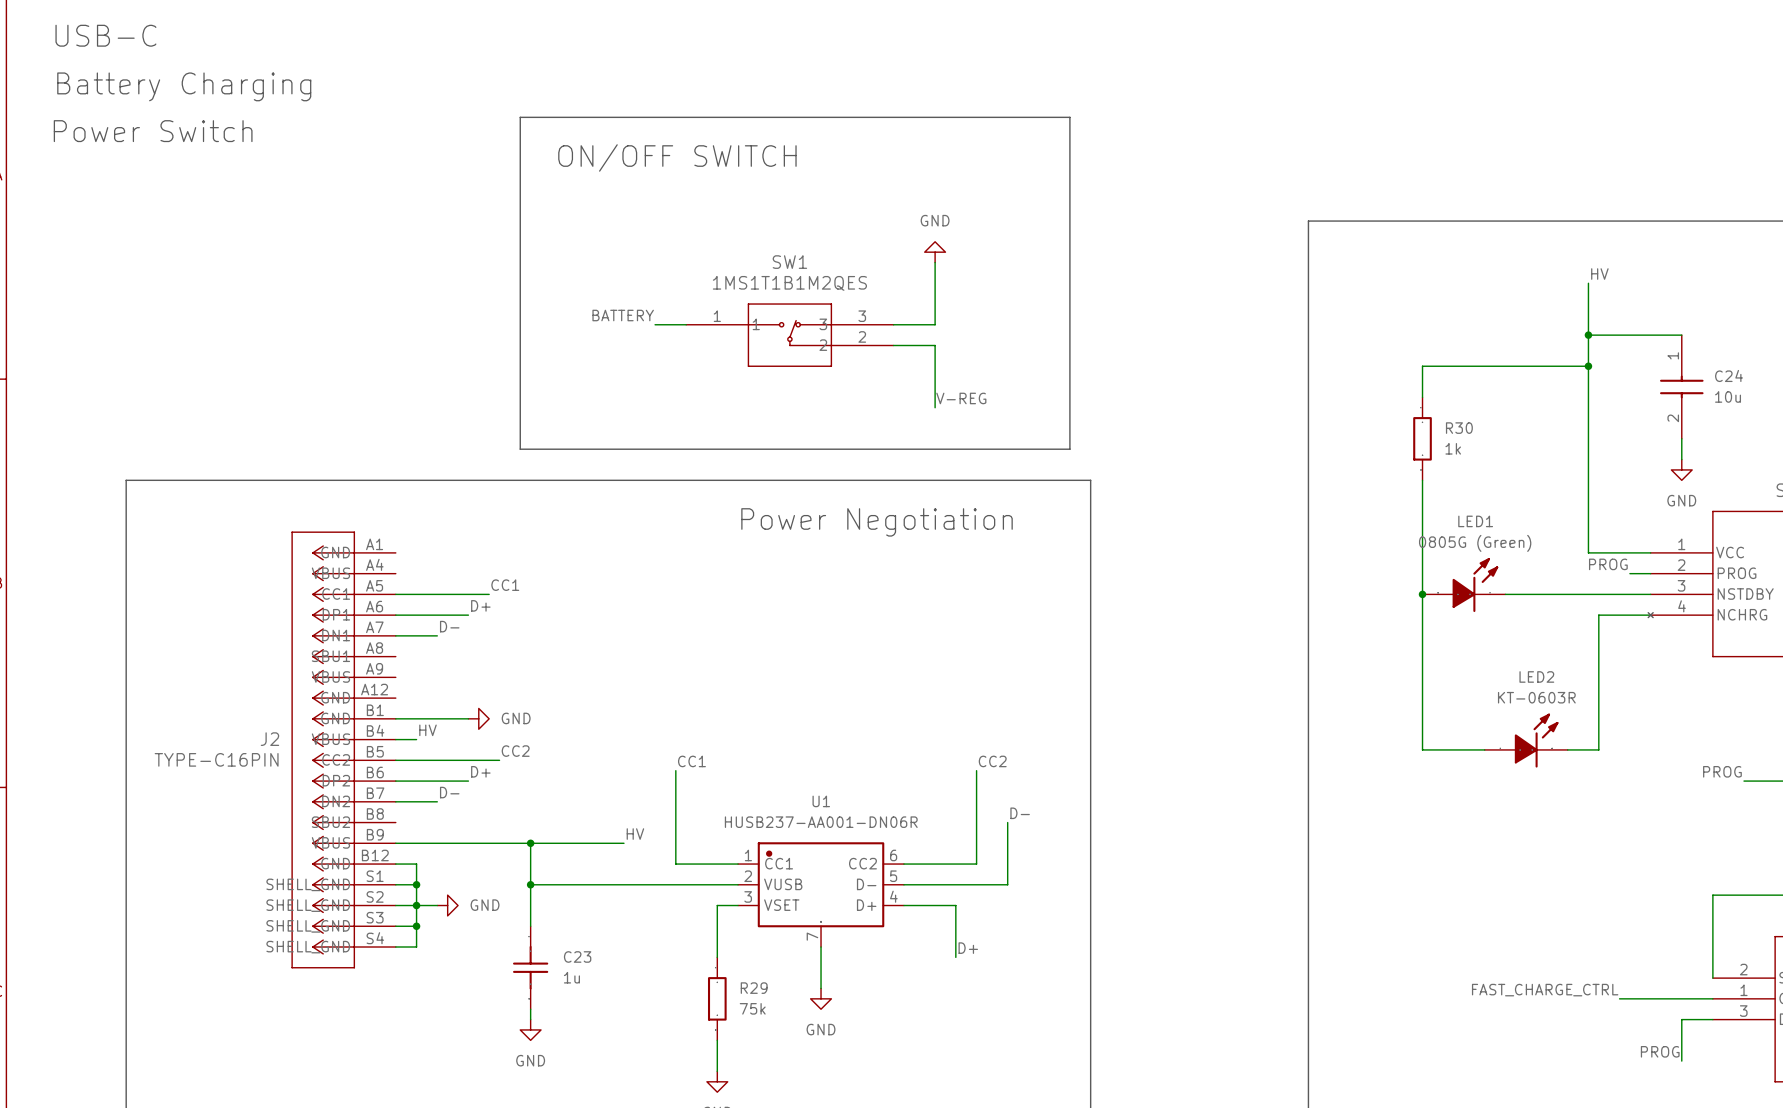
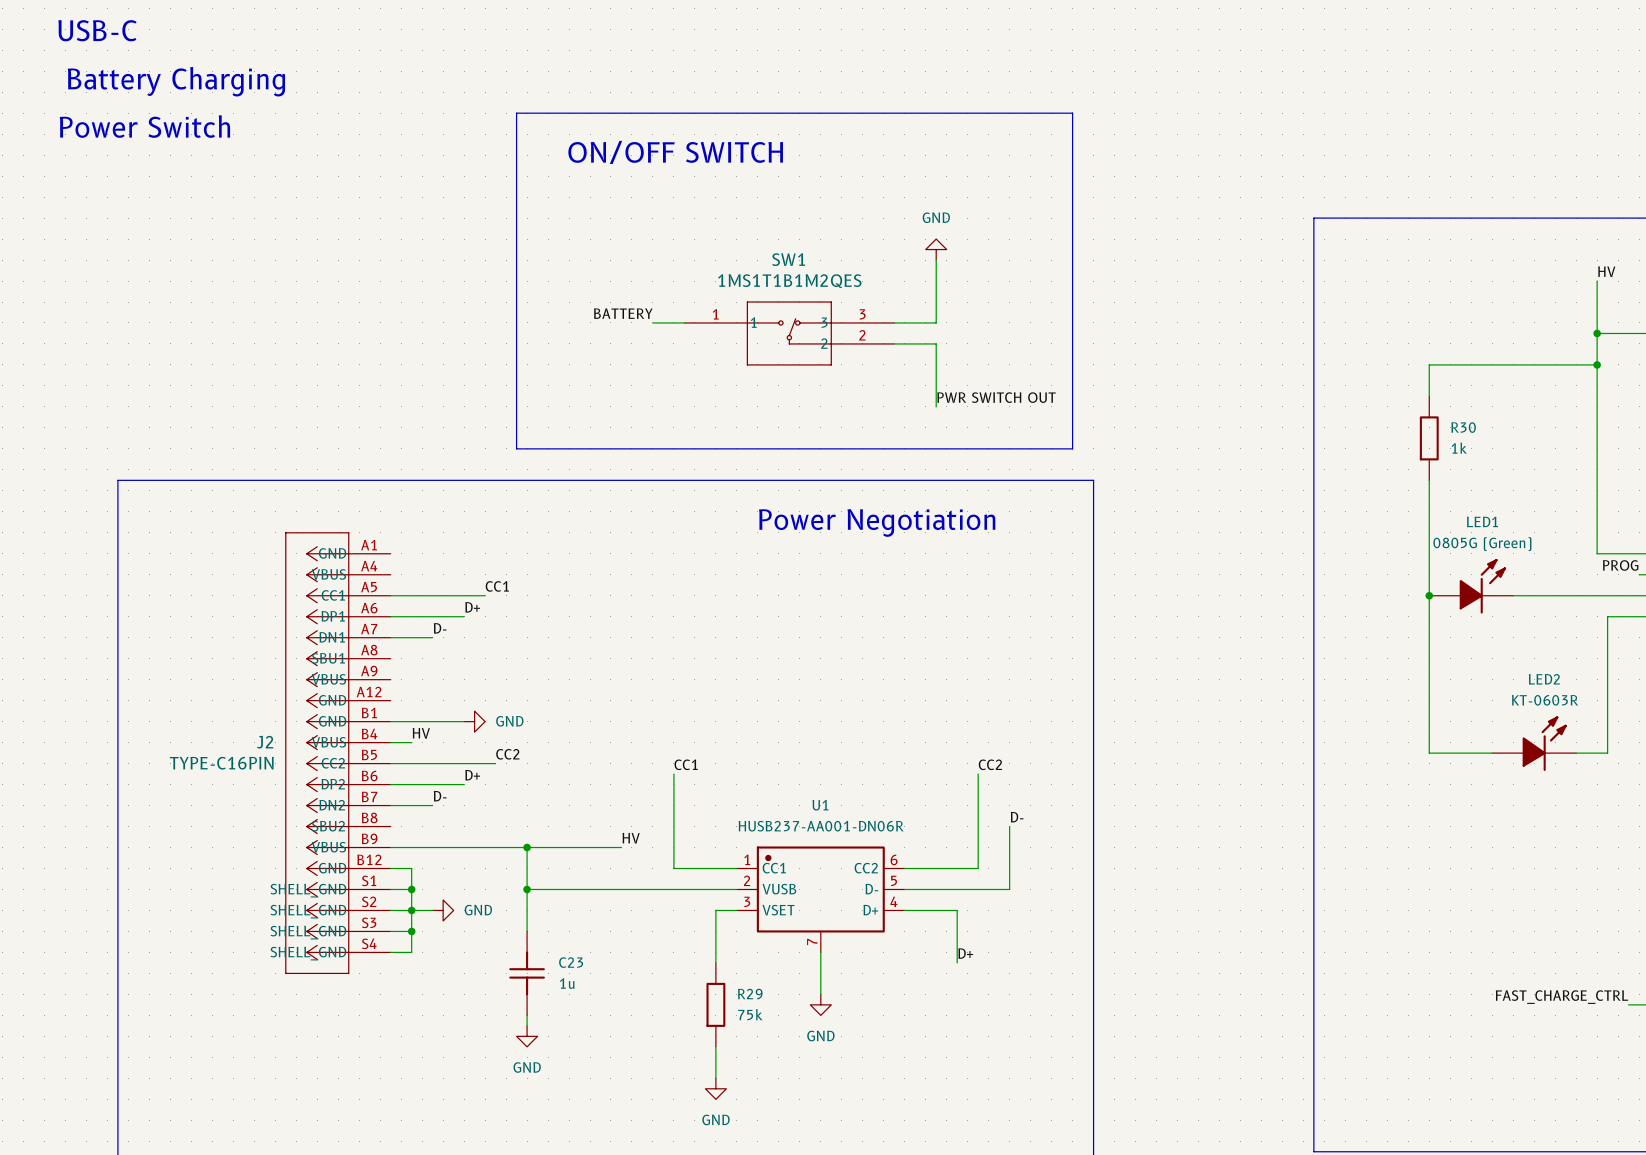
label: V-REG (961, 398) -> PWR SWITCH OUT (996, 397)

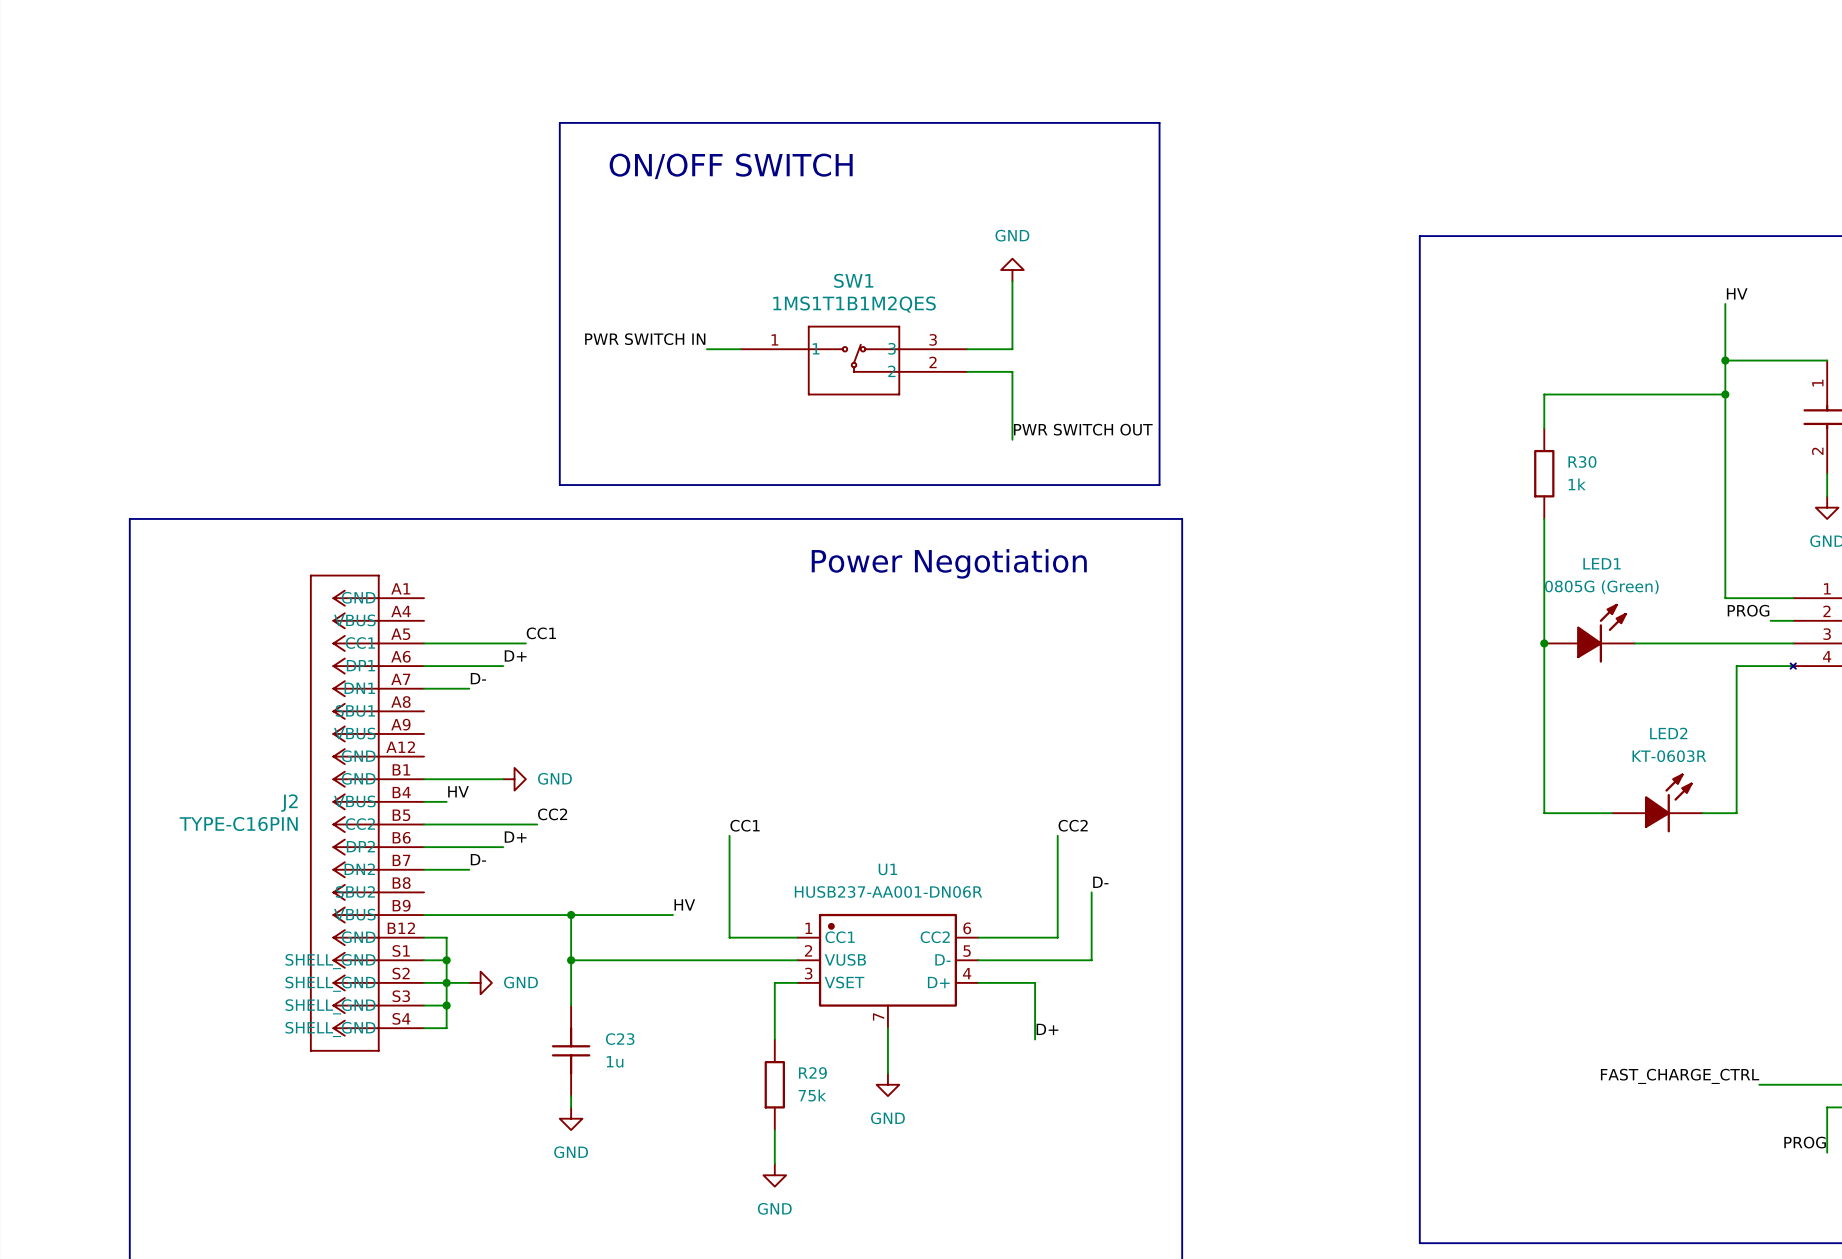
text: USB-C (97, 30) -> none
text: Battery Charging (176, 81) -> none
text: Power Switch (144, 126) -> none
label: BATTERY (623, 313) -> PWR SWITCH IN (645, 339)

